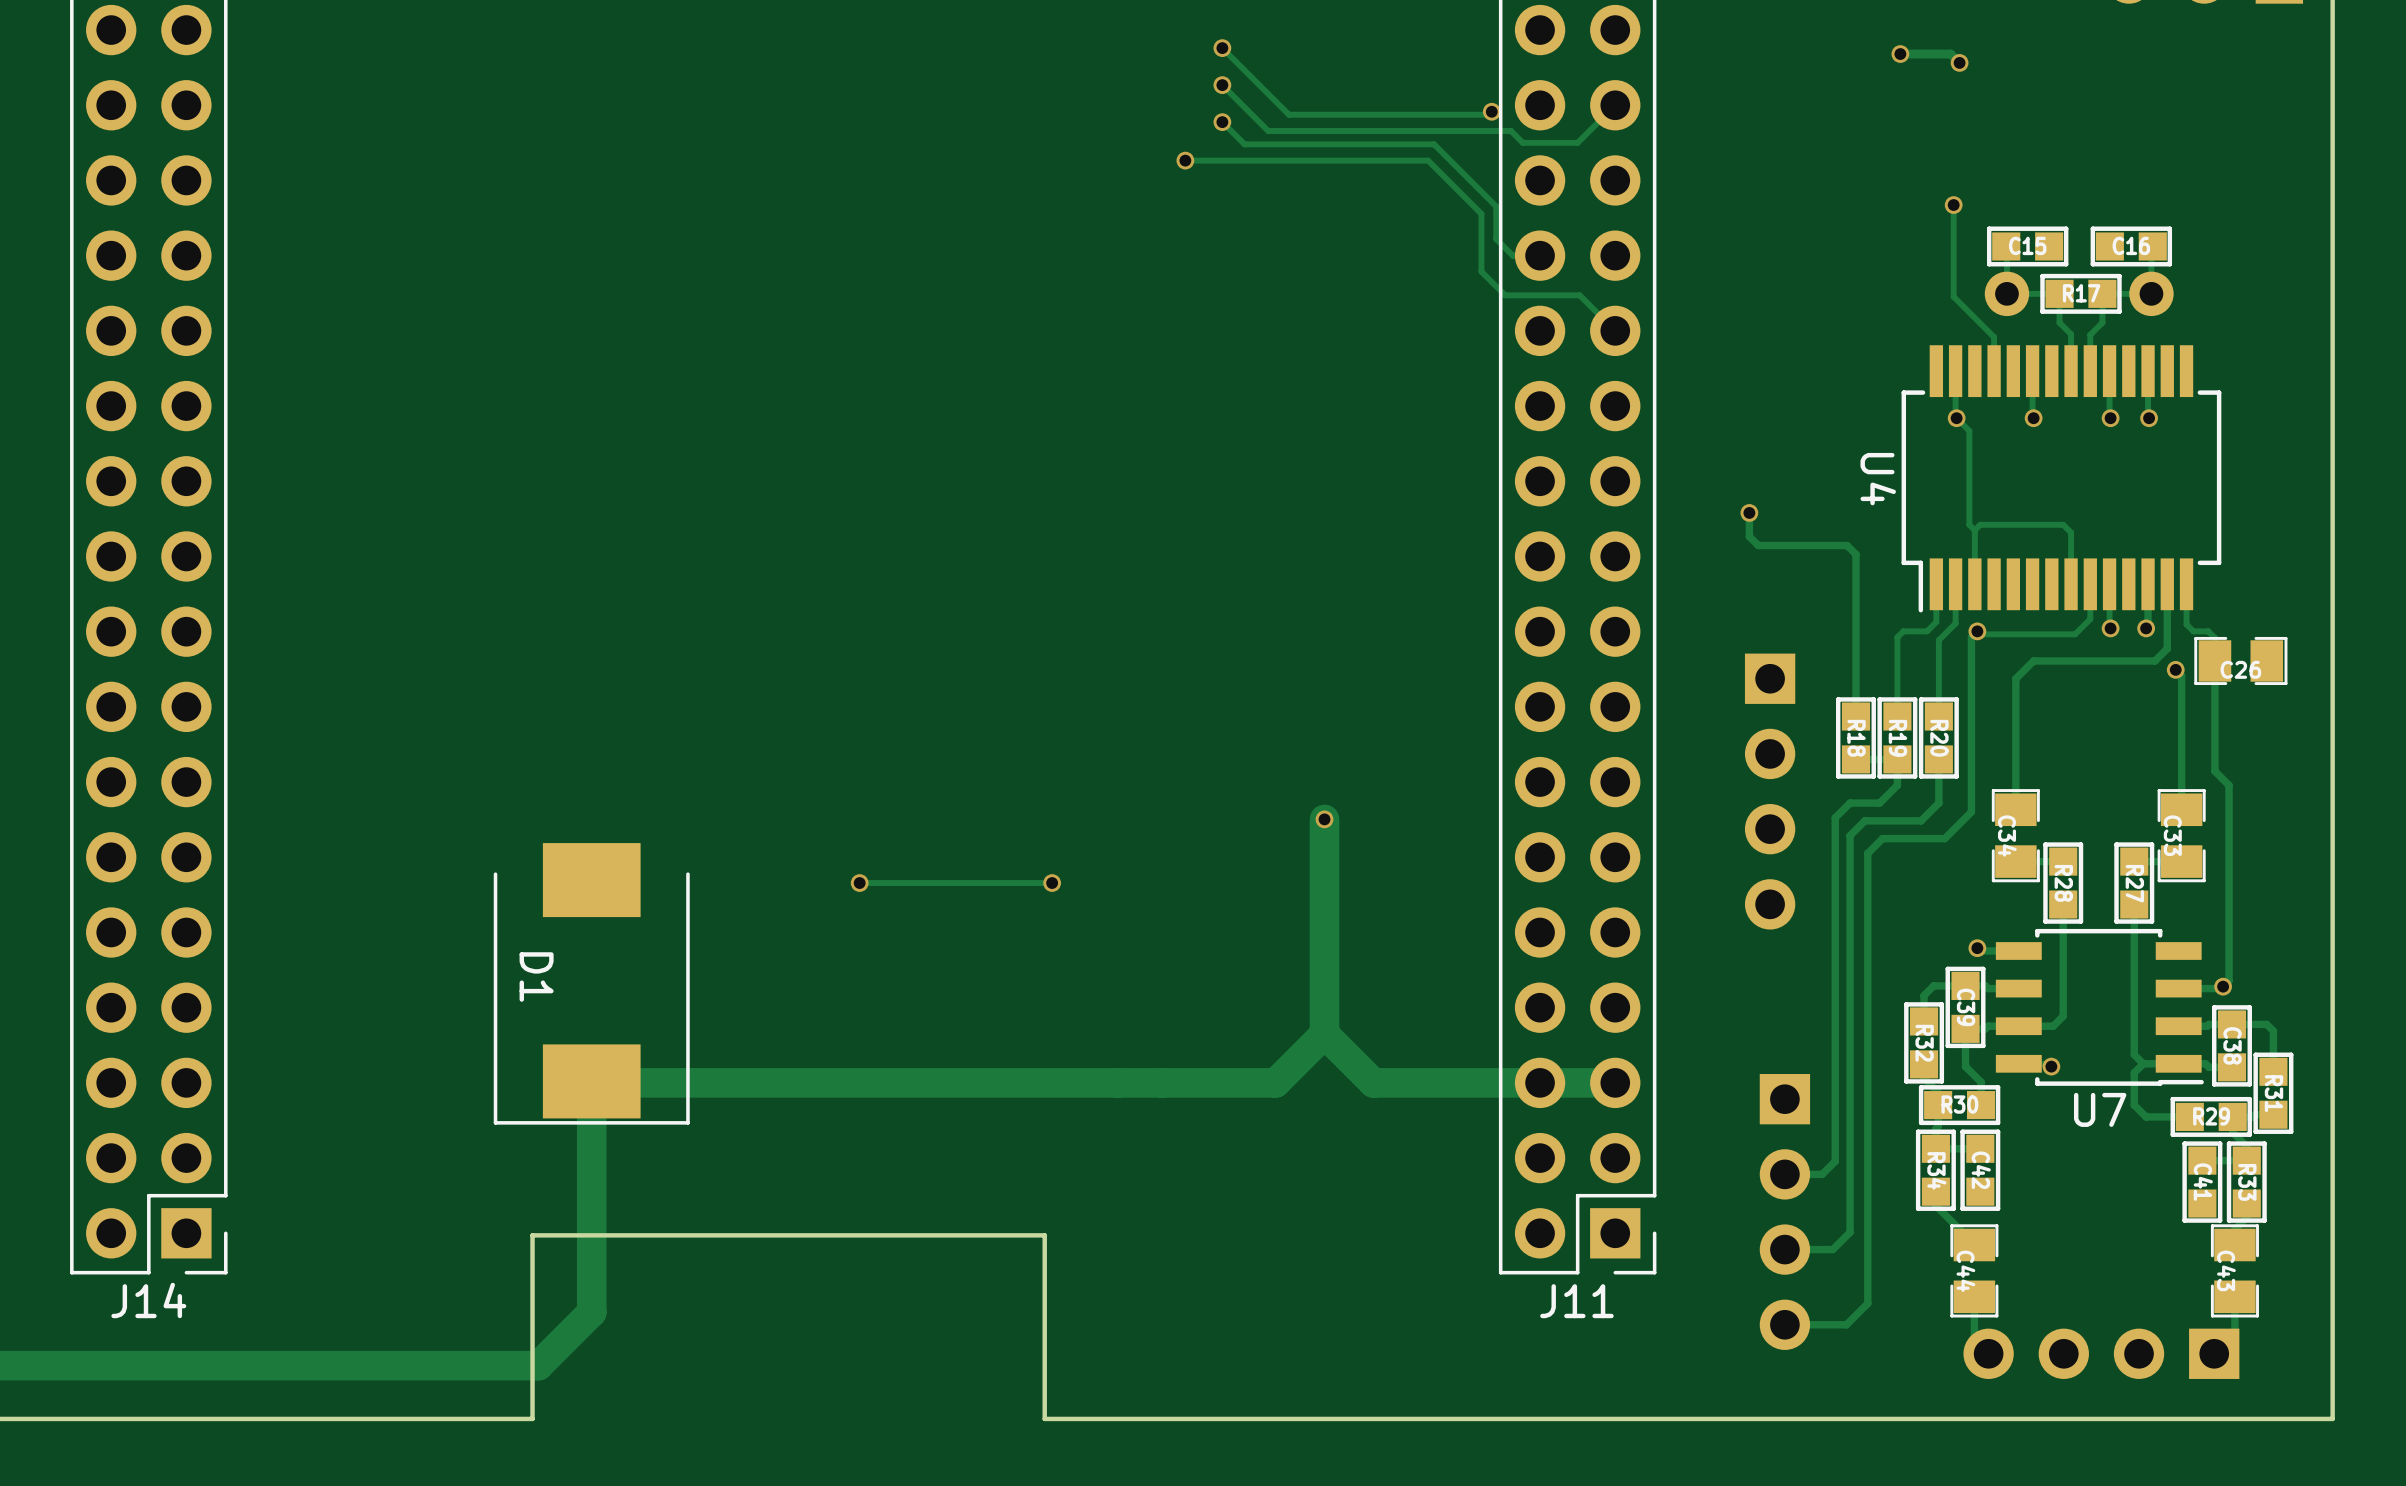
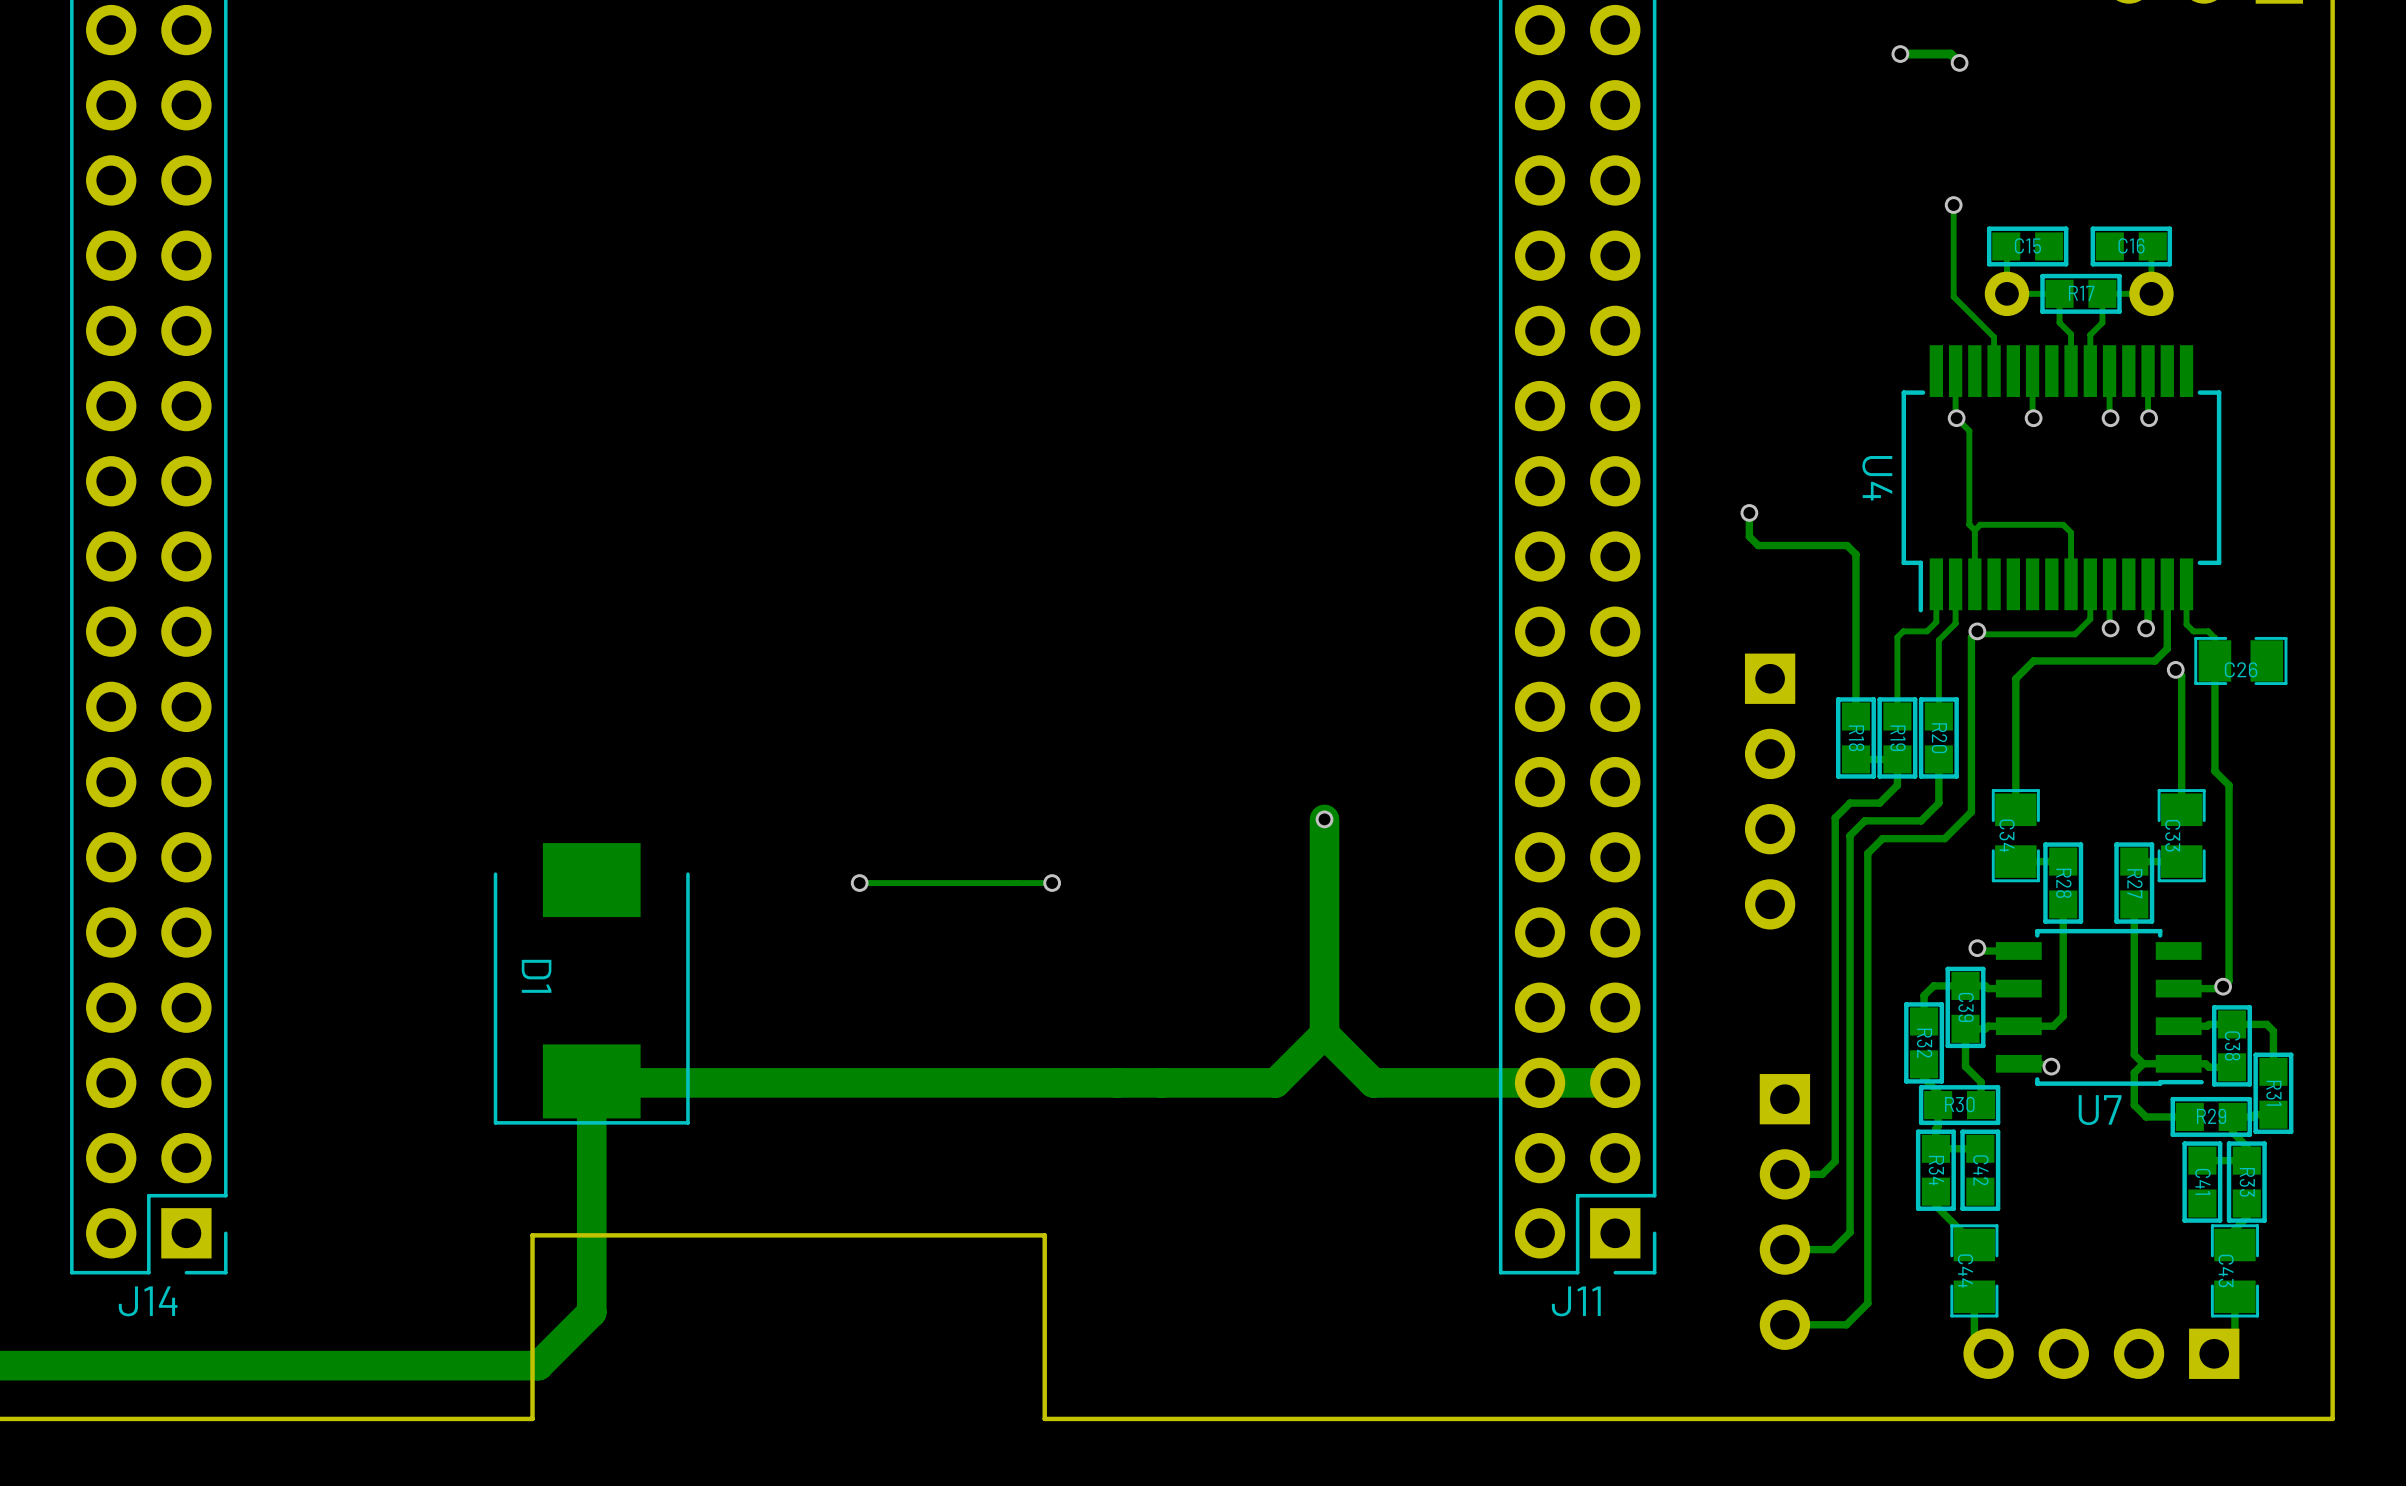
track: (1222, 48) (1288, 114) (1488, 114) (1491, 111) -> none
via: (1222, 48) -> none
track: (1222, 85) (1268, 131) (1511, 131) (1522, 142) (1577, 142) (1615, 105) -> none
via: (1222, 85) -> none
via: (1491, 111) -> none
track: (1222, 122) (1244, 144) (1434, 144) (1496, 206) (1496, 239) (1512, 255) (1540, 255) -> none
via: (1222, 122) -> none
track: (1185, 160) (1428, 160) (1481, 213) (1481, 271) (1505, 295) (1579, 295) (1615, 330) -> none
via: (1185, 160) -> none

